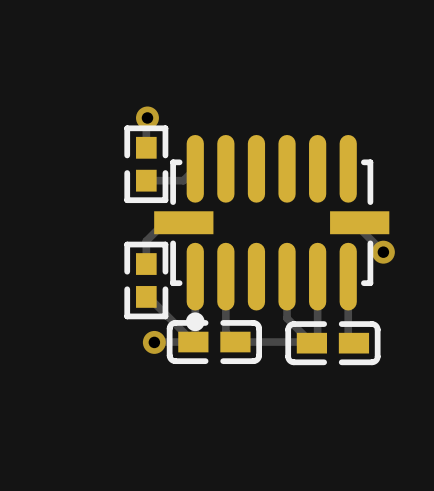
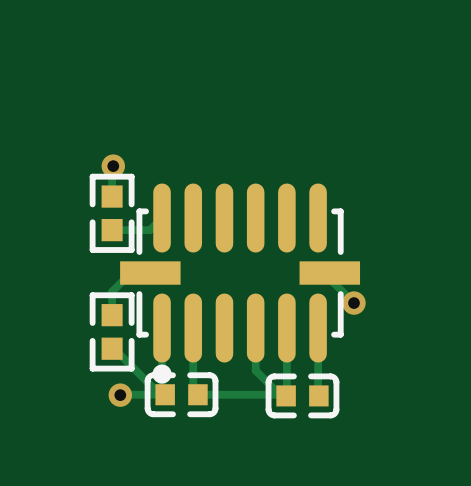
part footprint: [166, 320, 262, 365] -> [144, 372, 219, 418]
part footprint: [285, 321, 381, 366] -> [265, 373, 340, 419]

